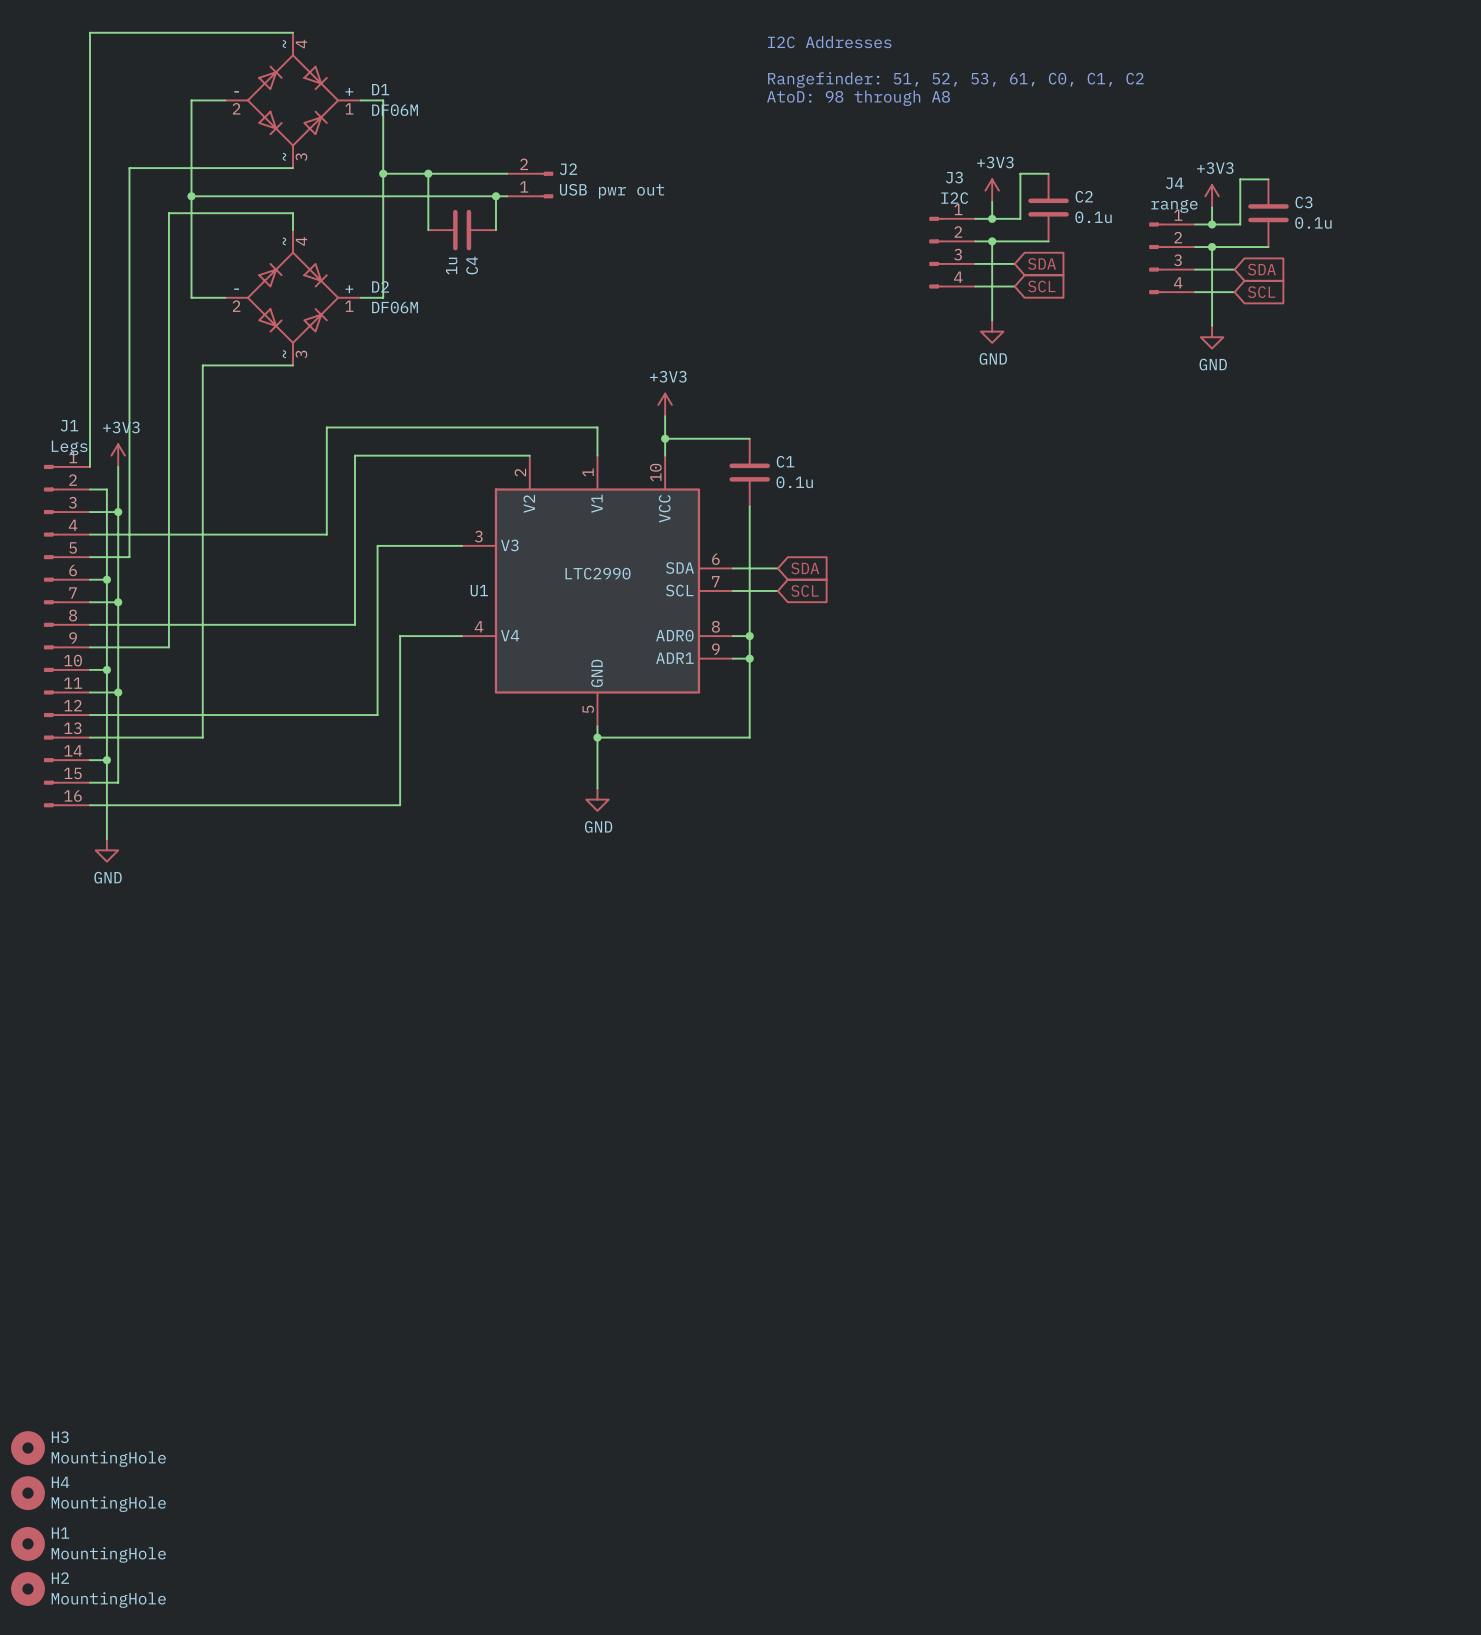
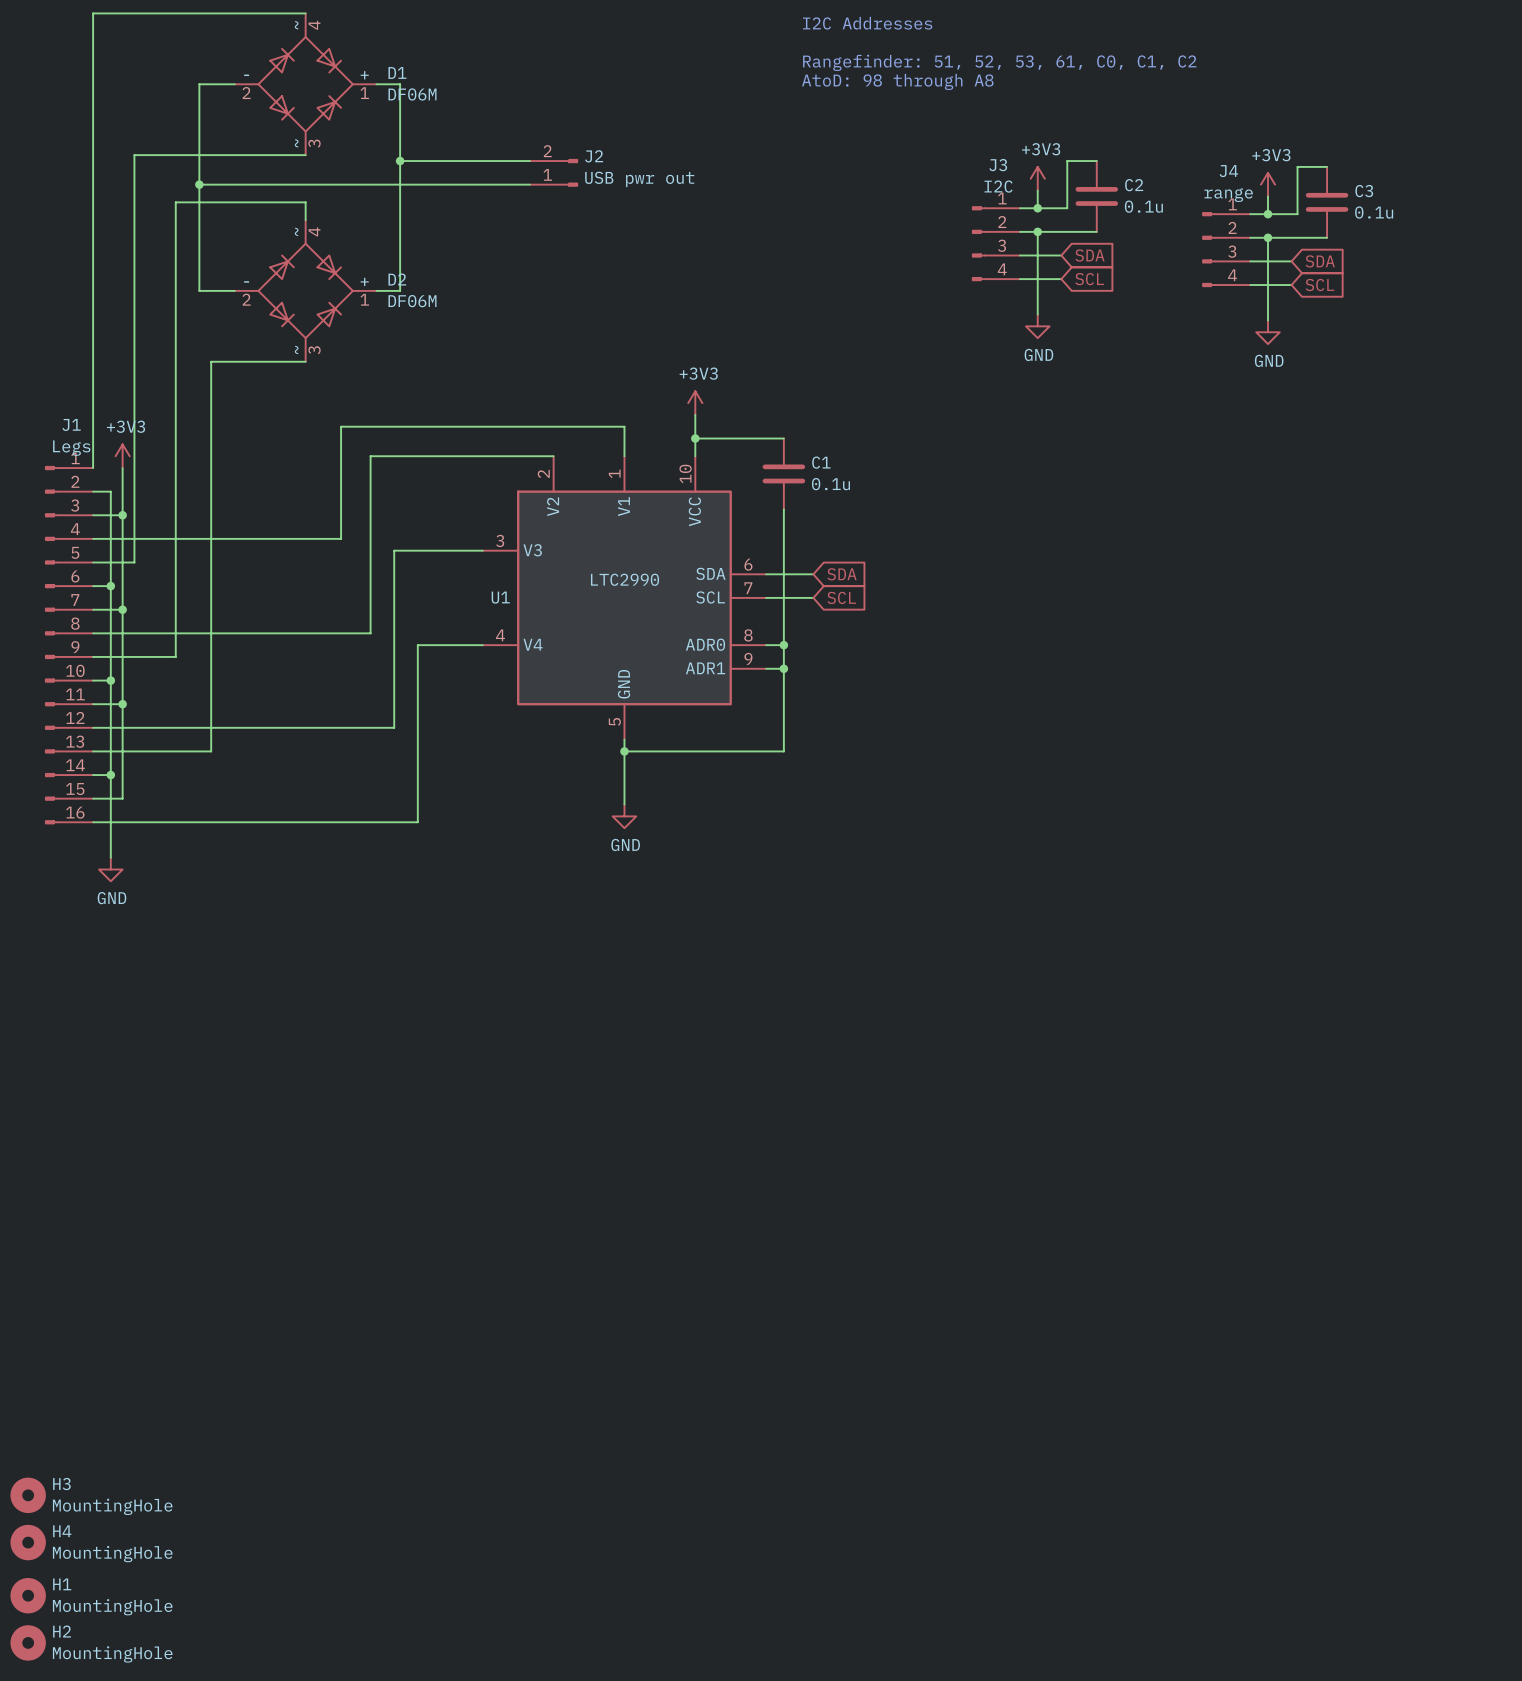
wire: (428, 173) (428, 230) -> none
junction: (428, 173) -> none
wire: (495, 196) (495, 230) -> none
junction: (495, 196) -> none
C4: 1u (462, 230) -> none

